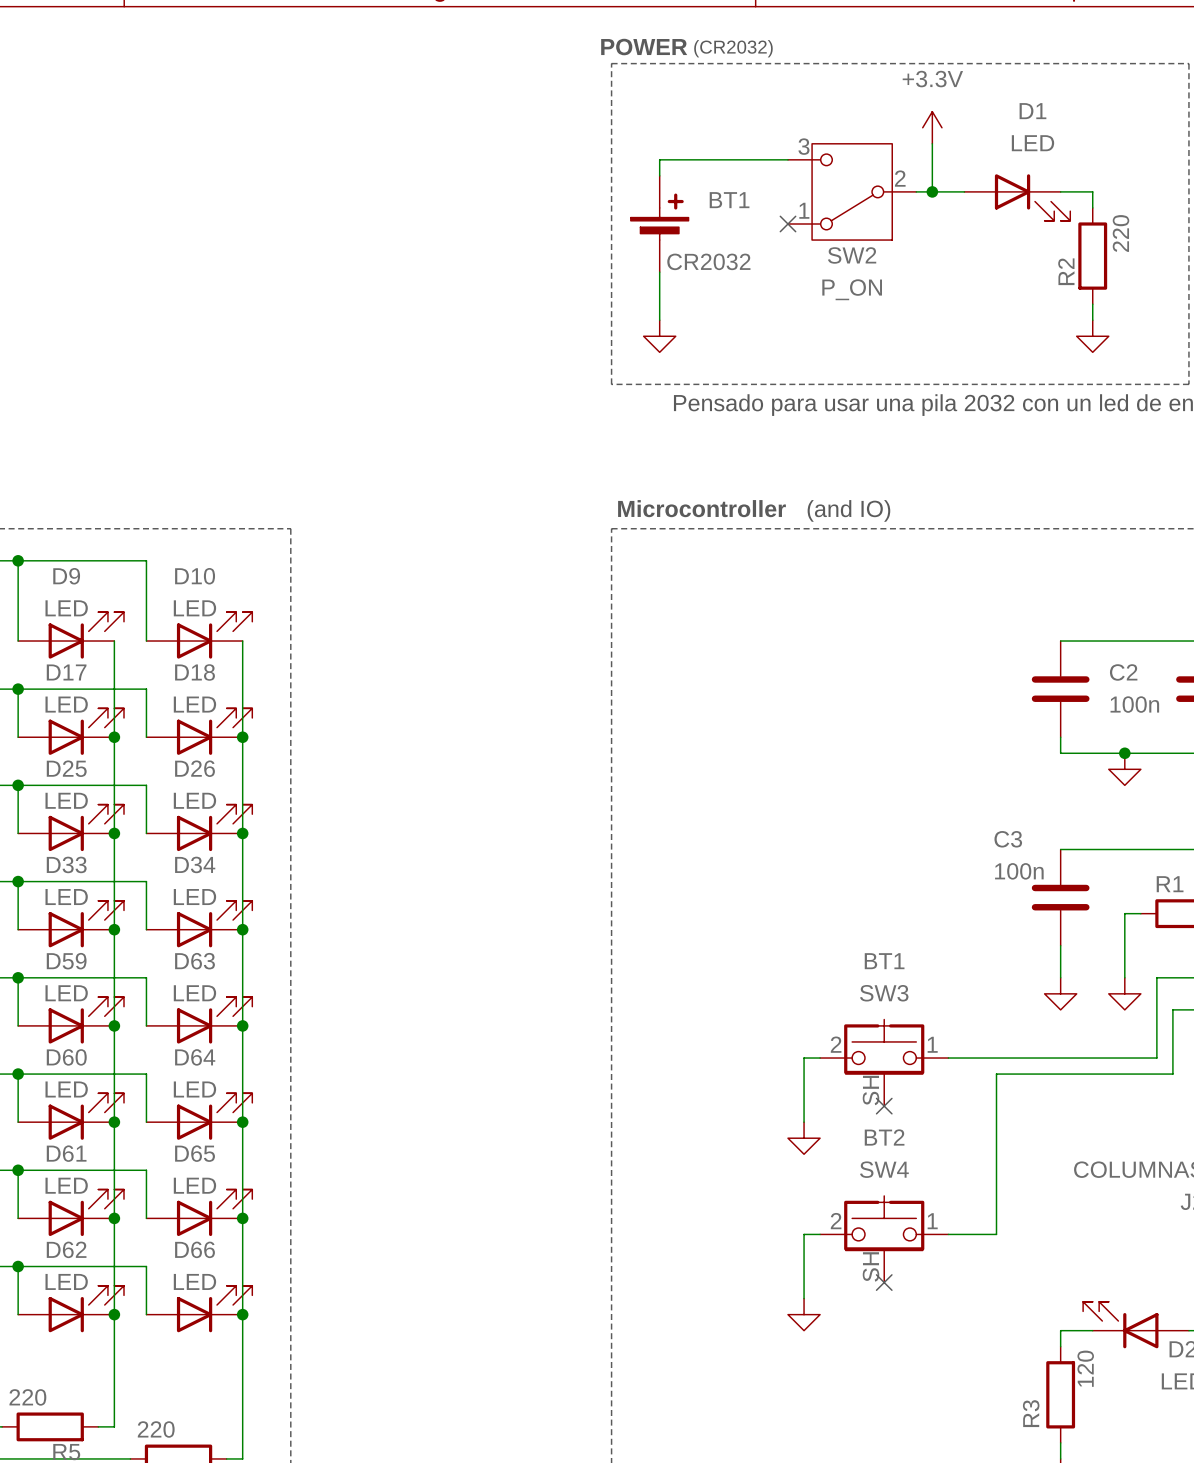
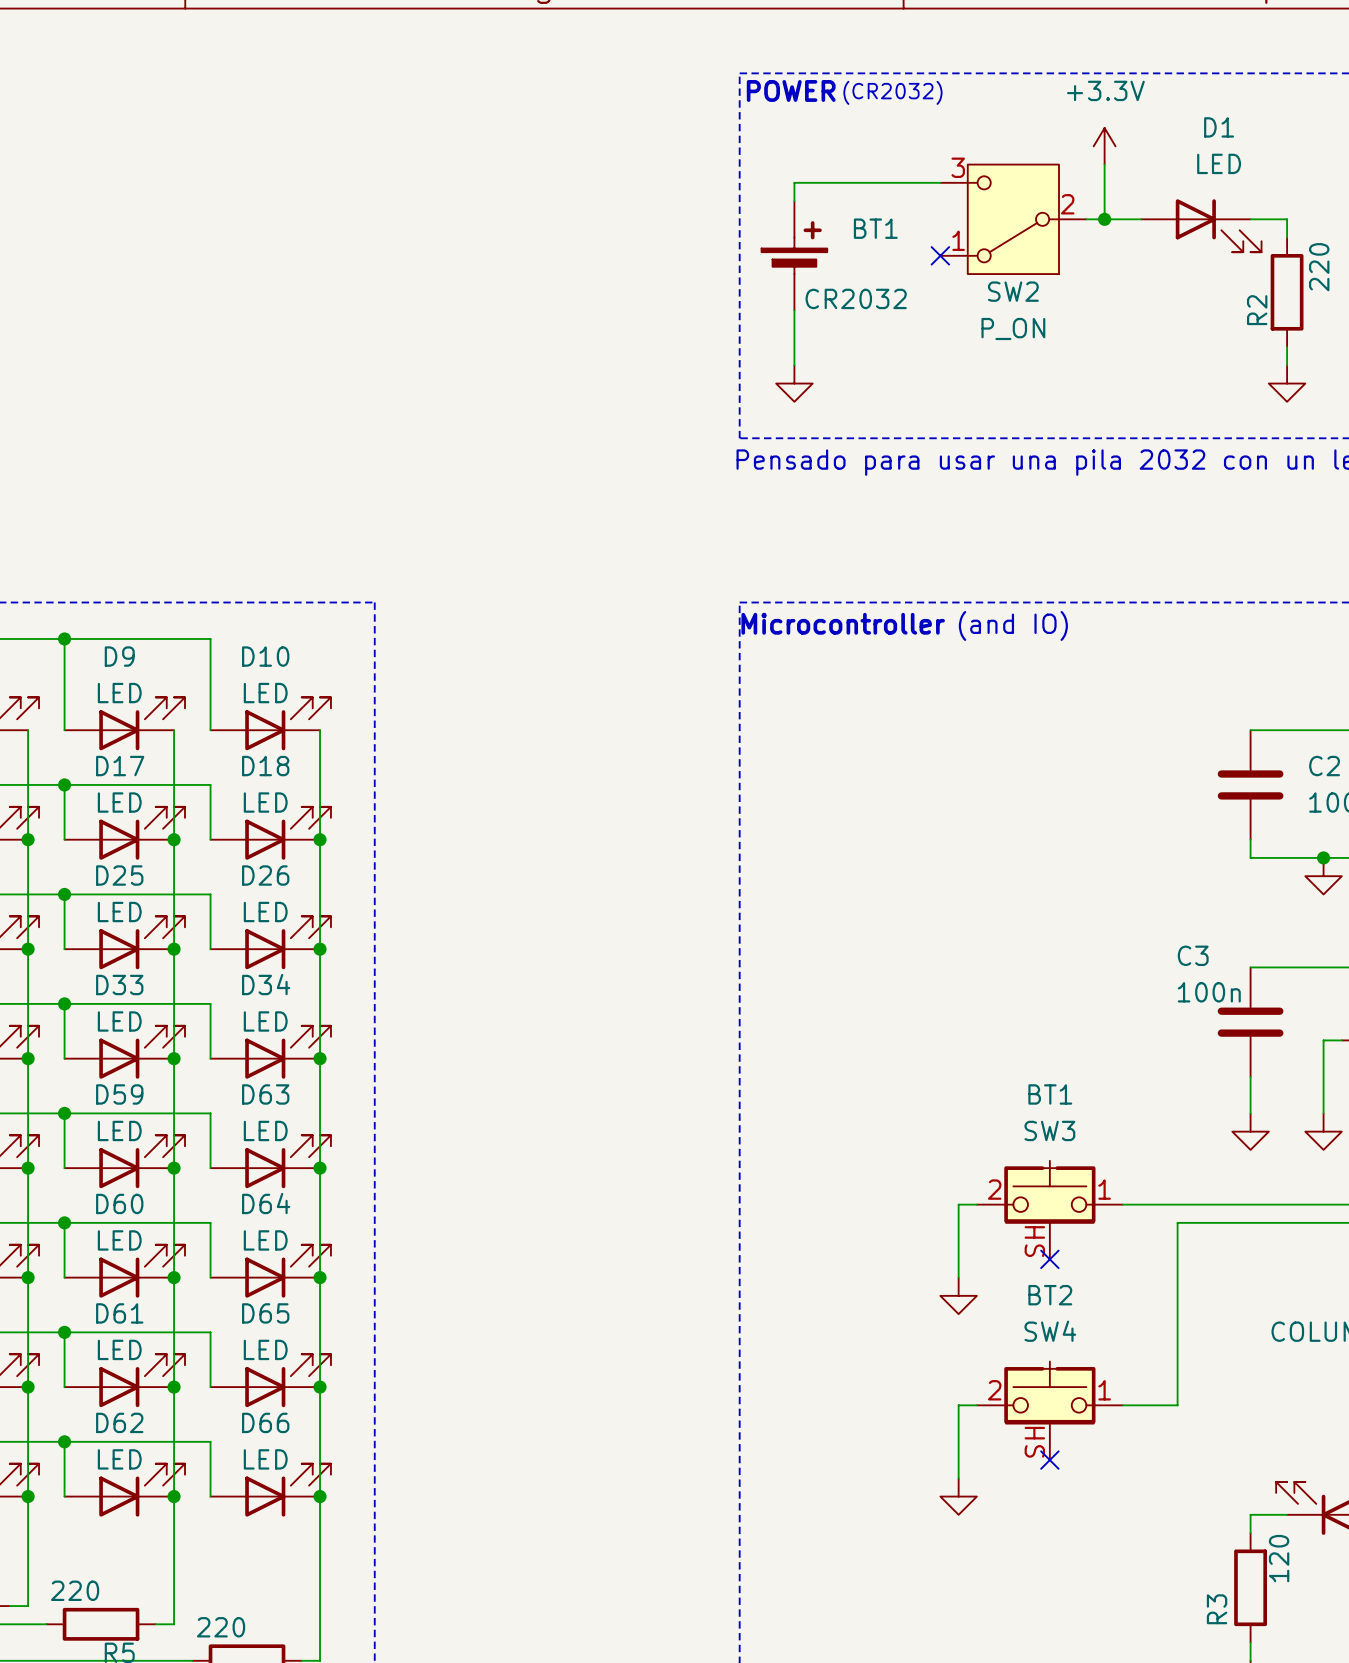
text position: POWER (644, 47) -> POWER (791, 90)
text position: (CR2032) (733, 48) -> (CR2032) (892, 92)
text position: Microcontroller (701, 508) -> Microcontroller (843, 623)
text position: (and IO) (848, 510) -> (and IO) (1013, 625)

